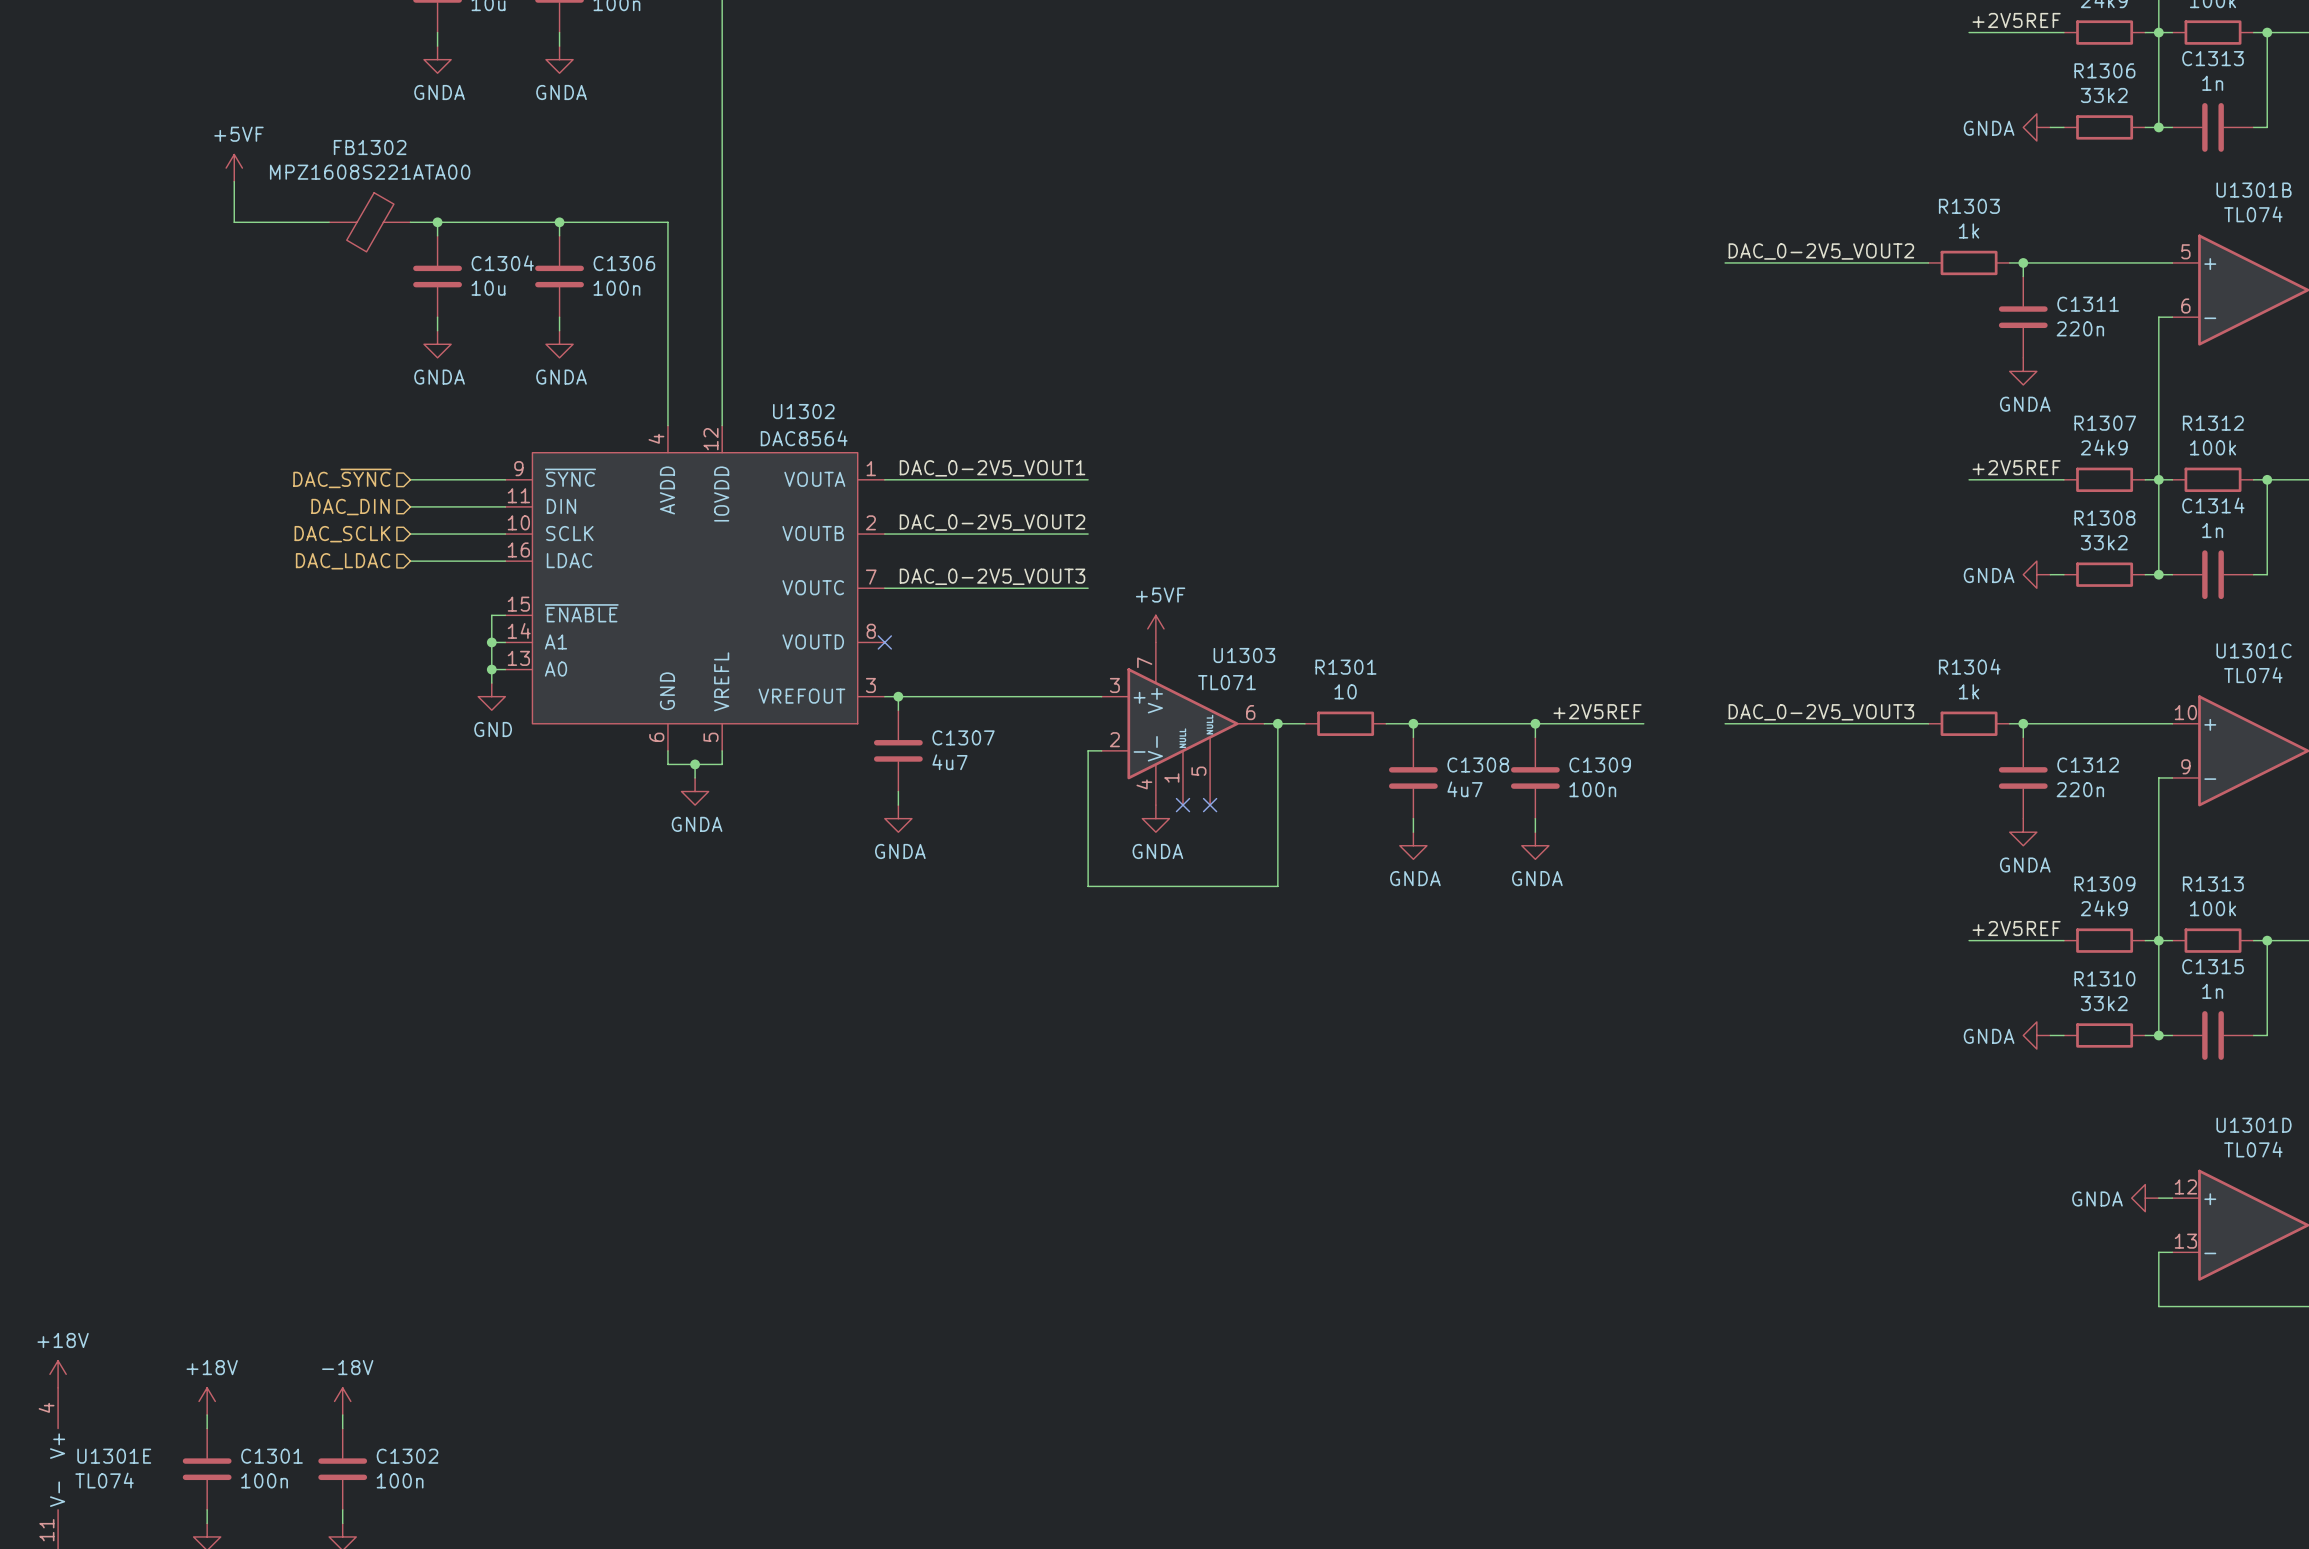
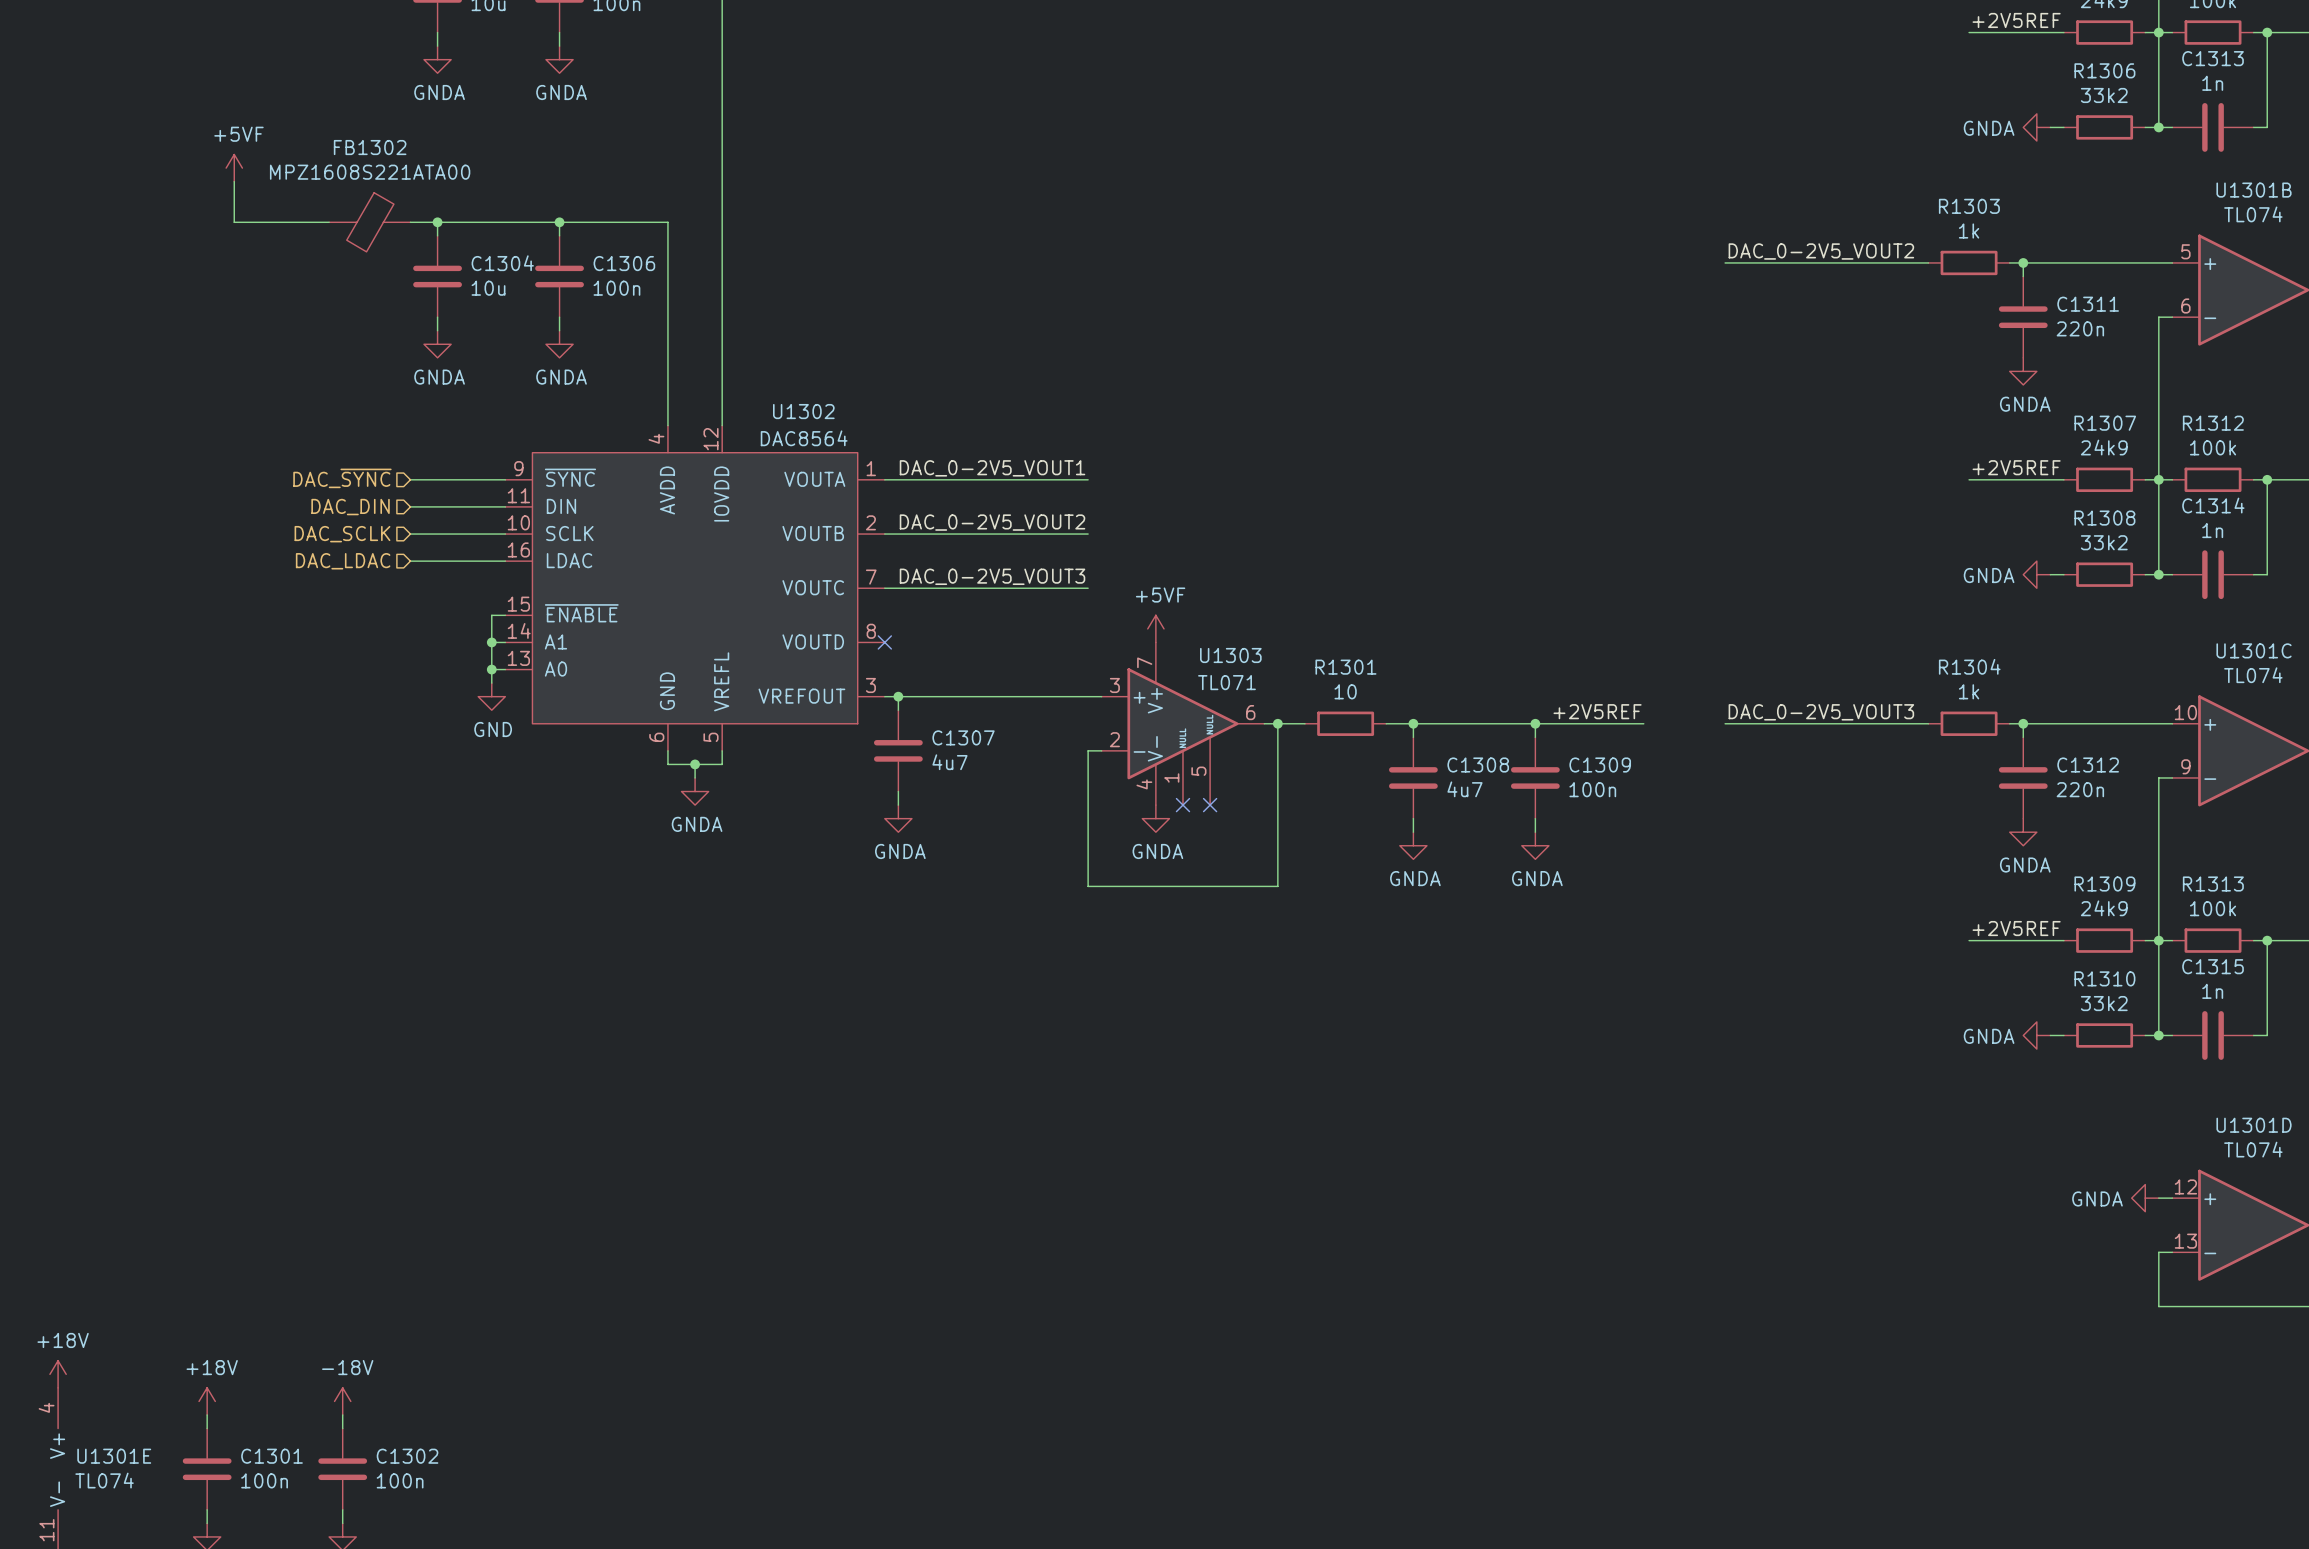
U1303 name position: U1303 (1244, 655) -> U1303 (1230, 655)

